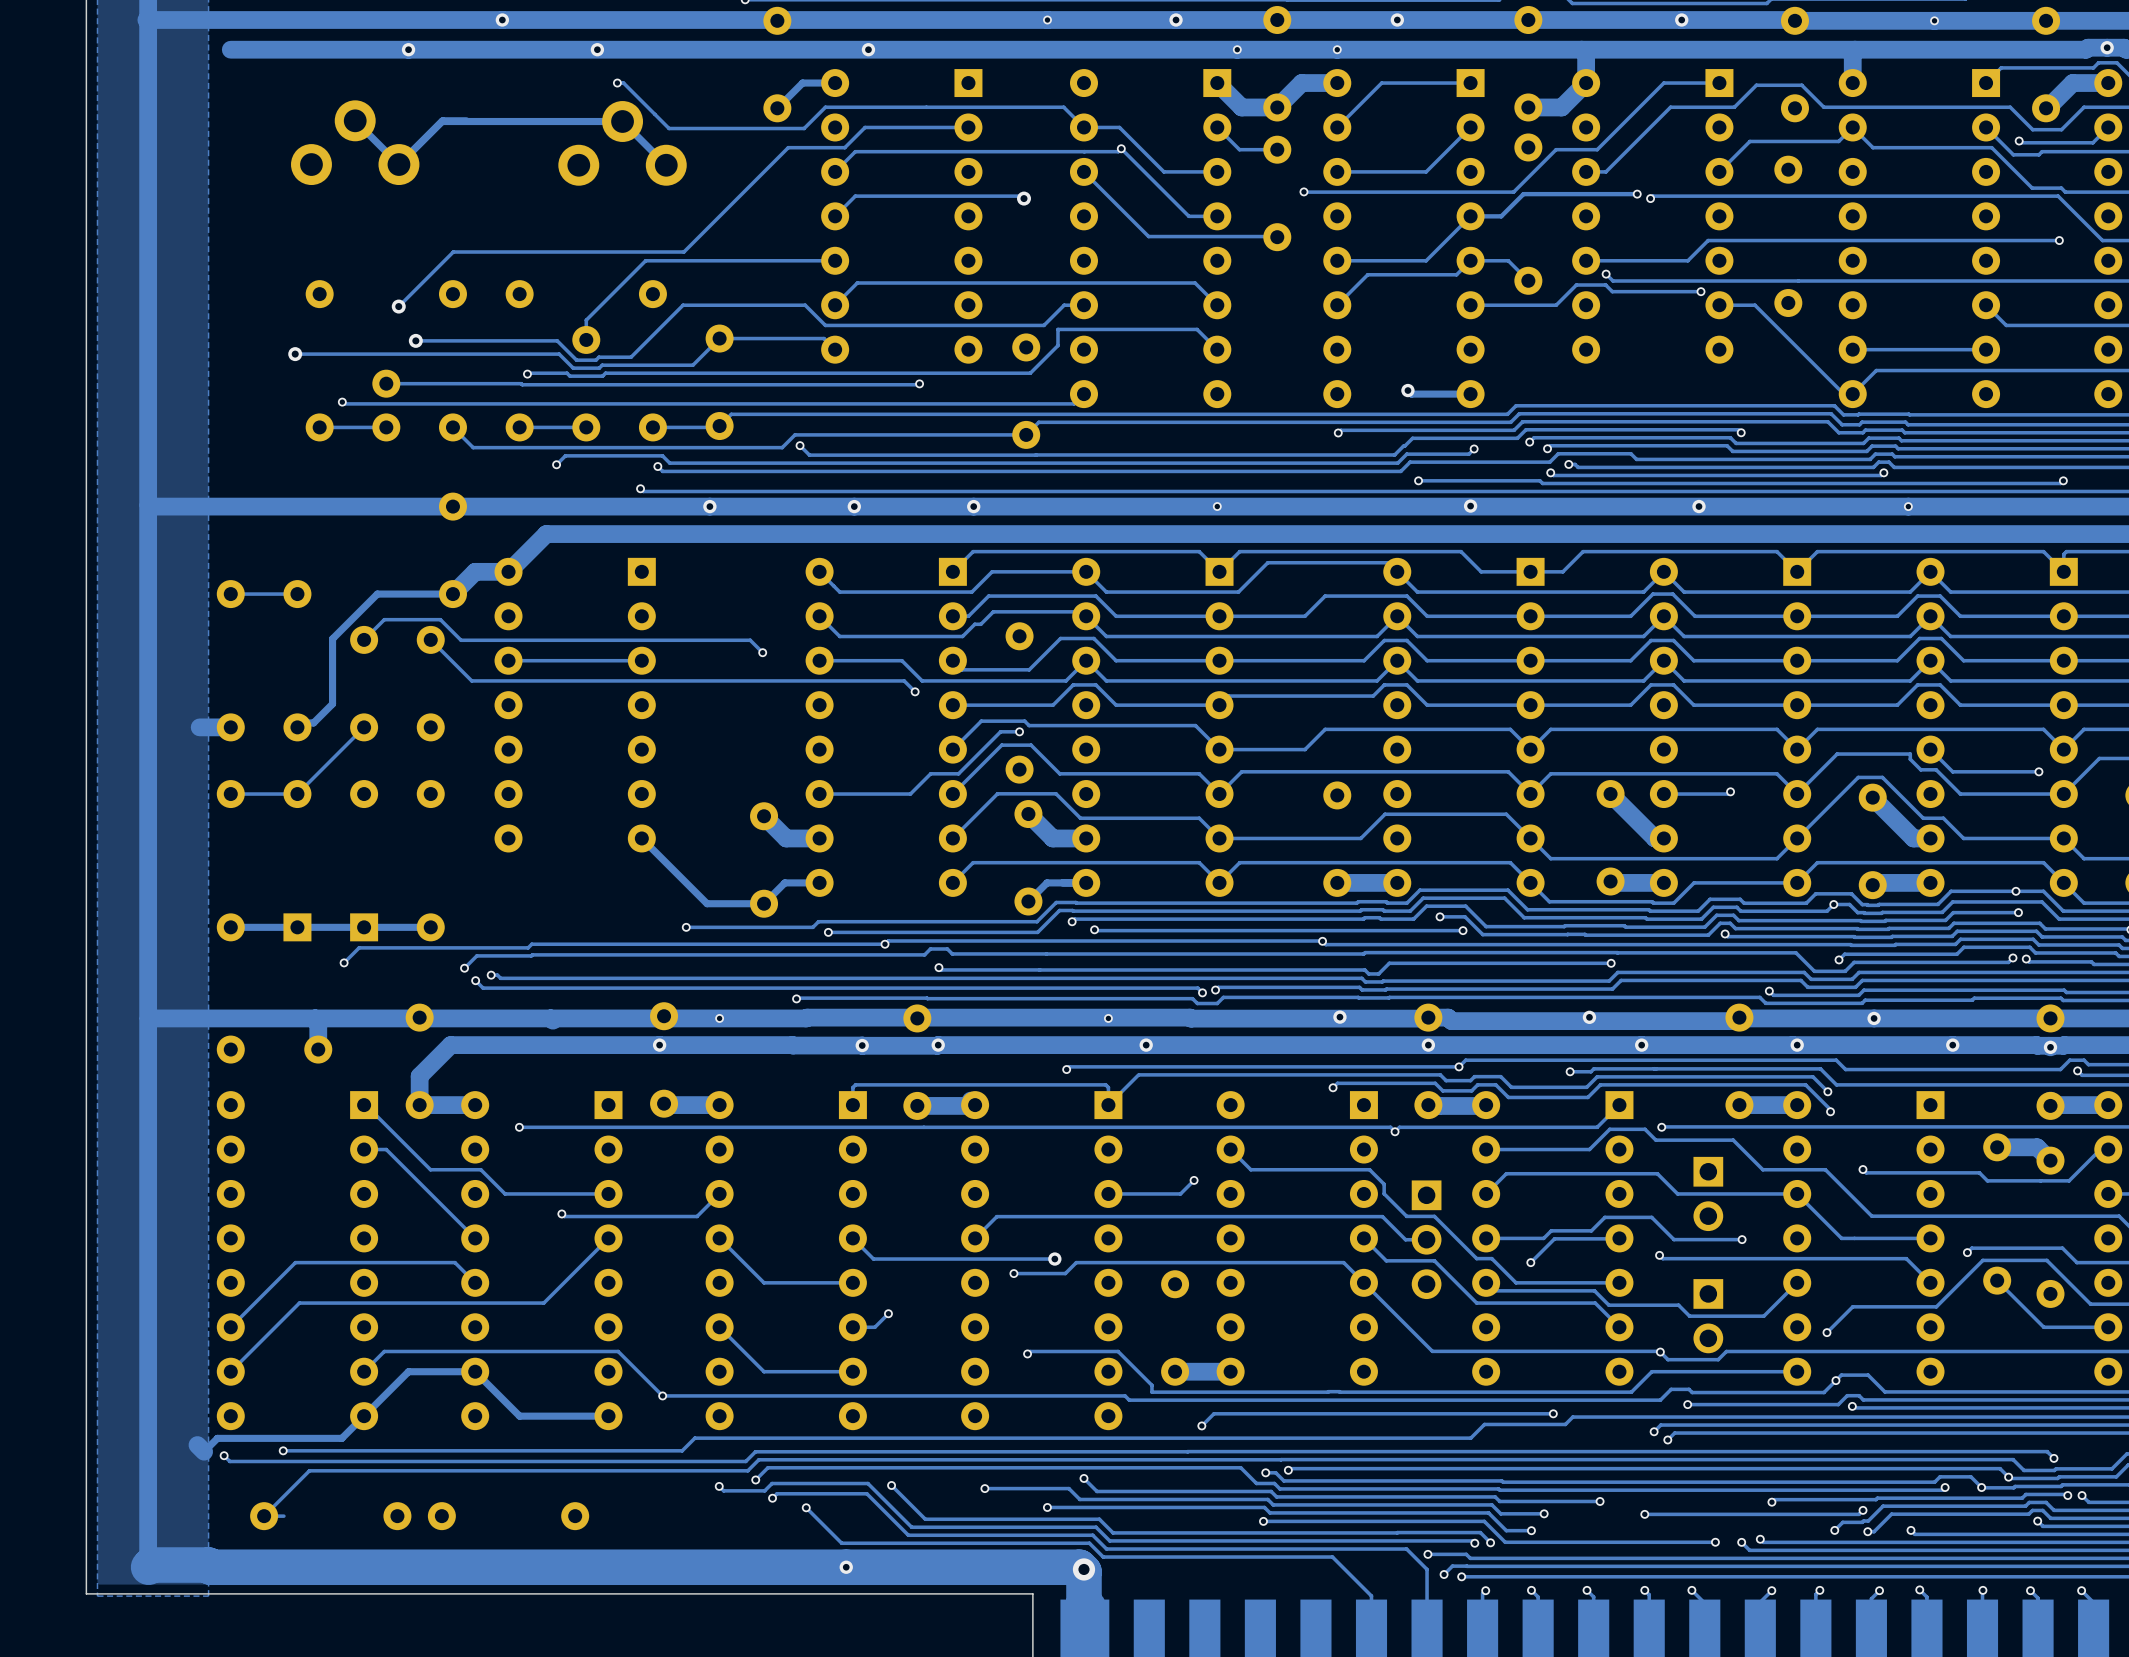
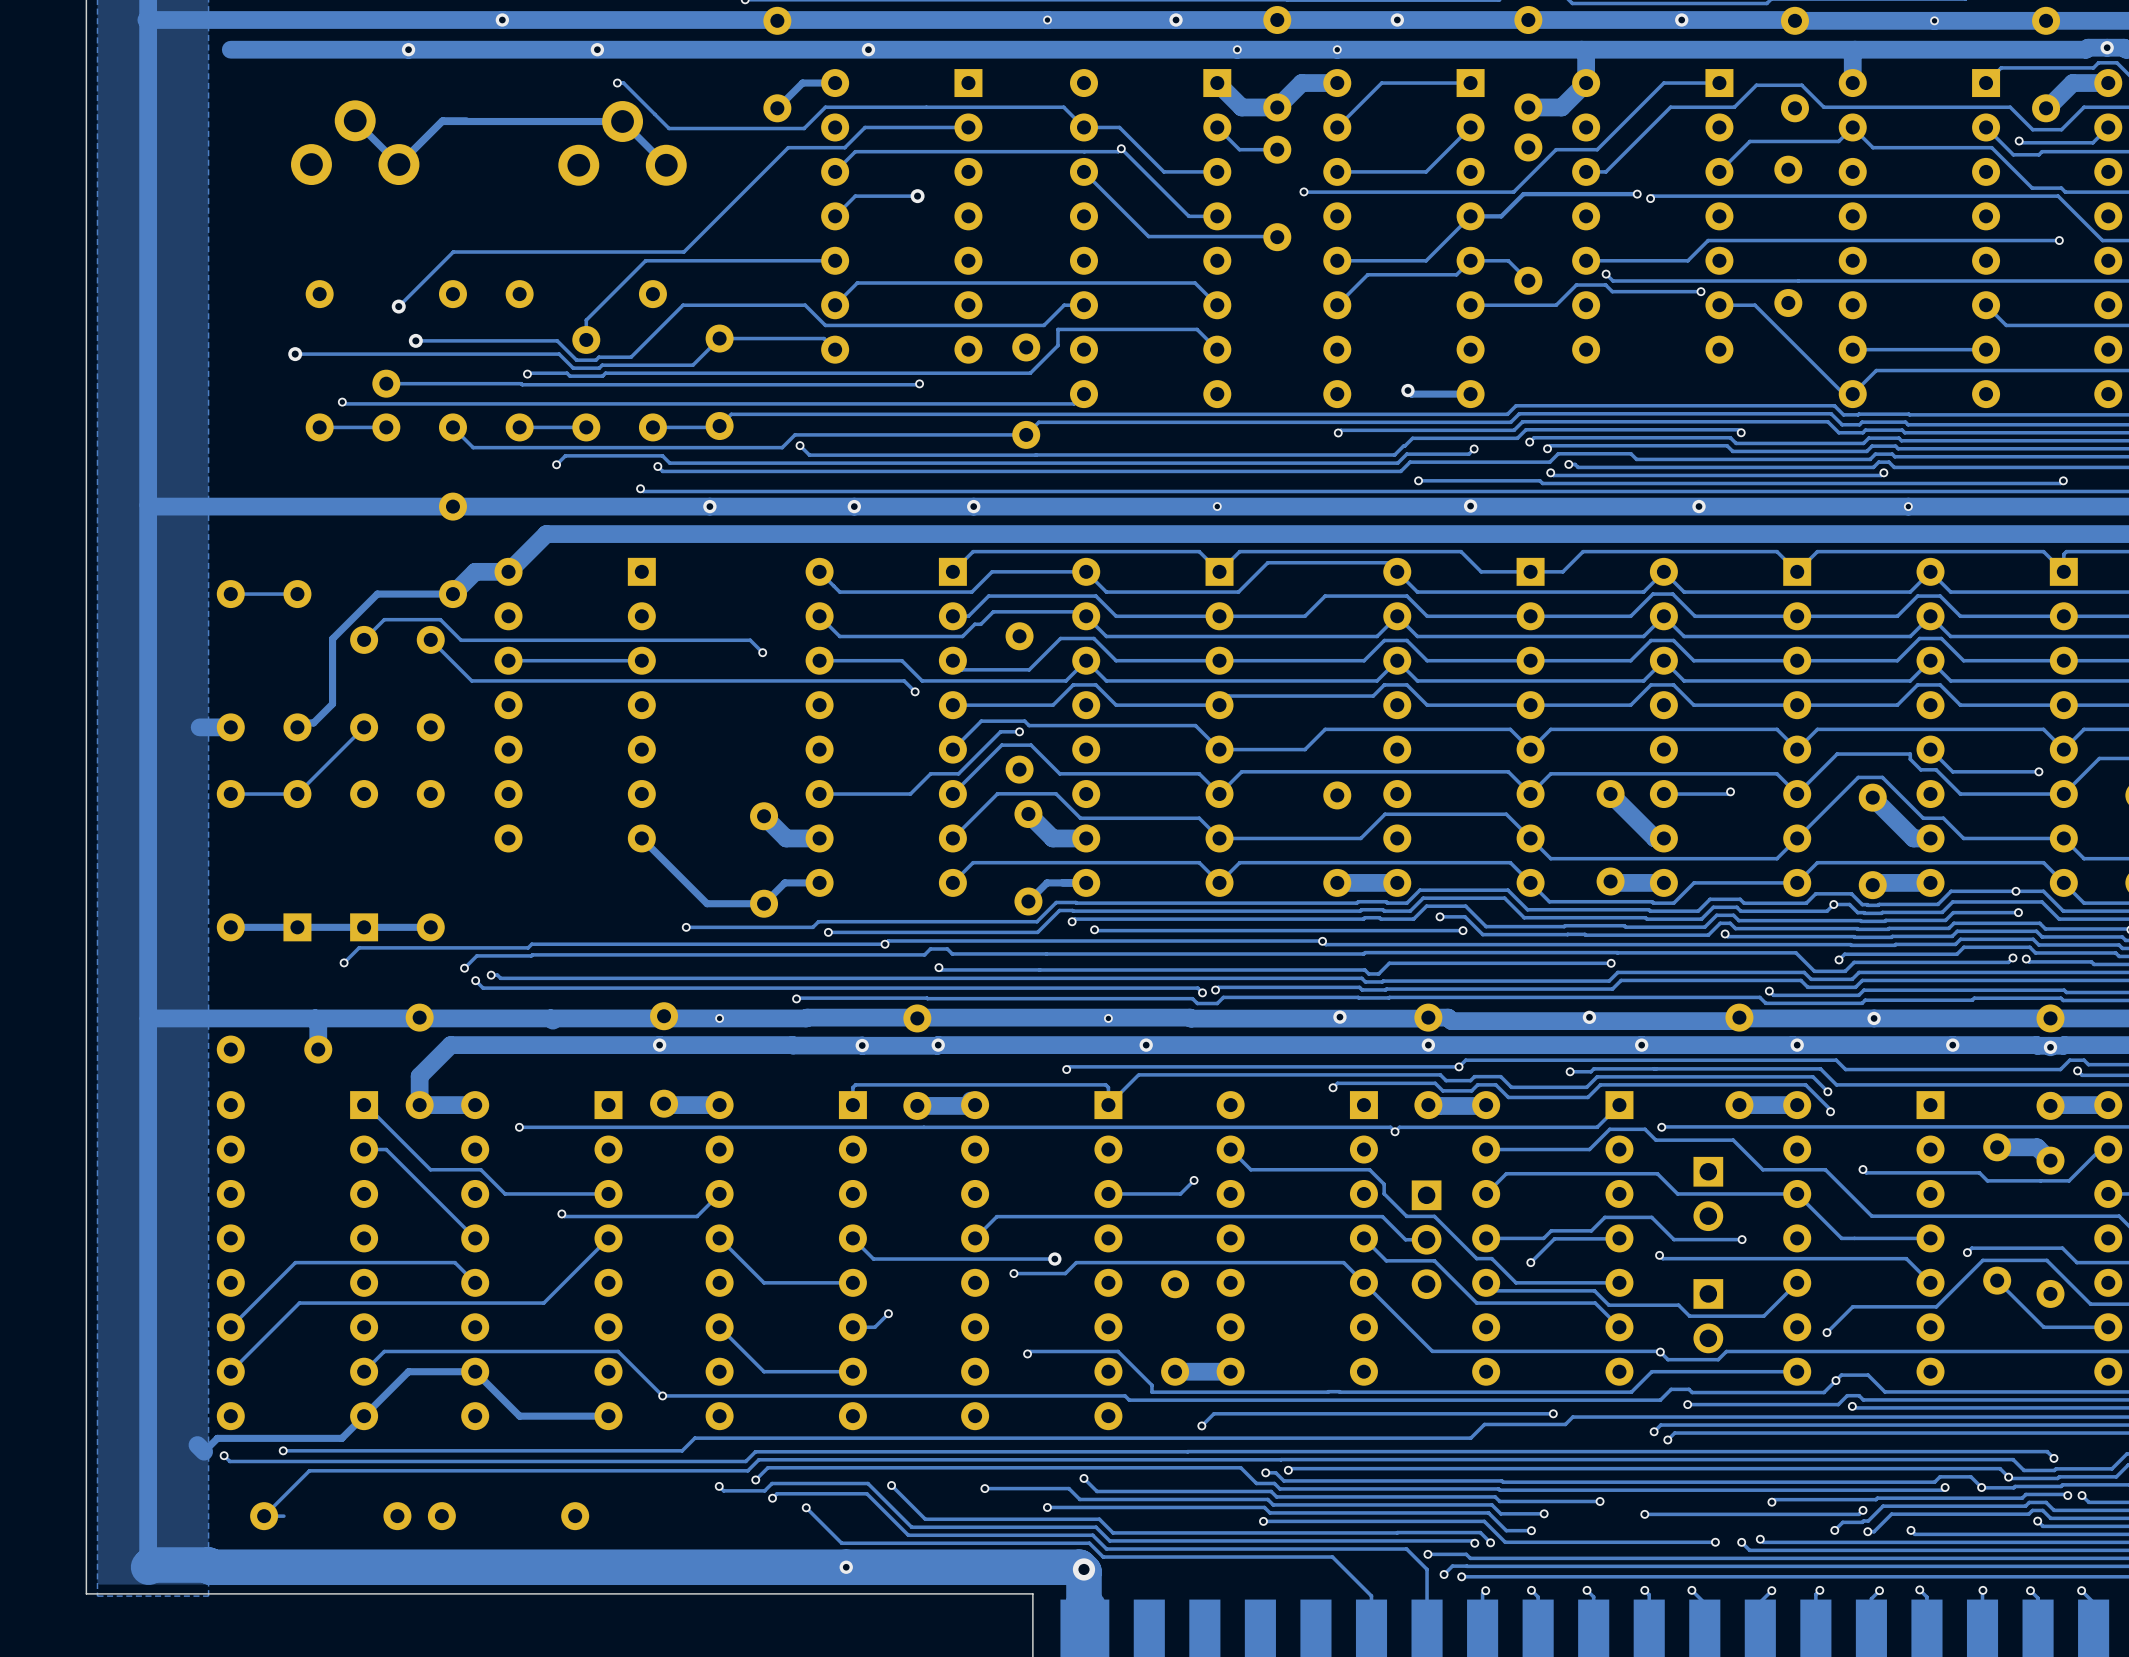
track: (917, 196) (1021, 196) (1024, 198) -> none
via: none -> (917, 196)
via: (1024, 198) -> none

